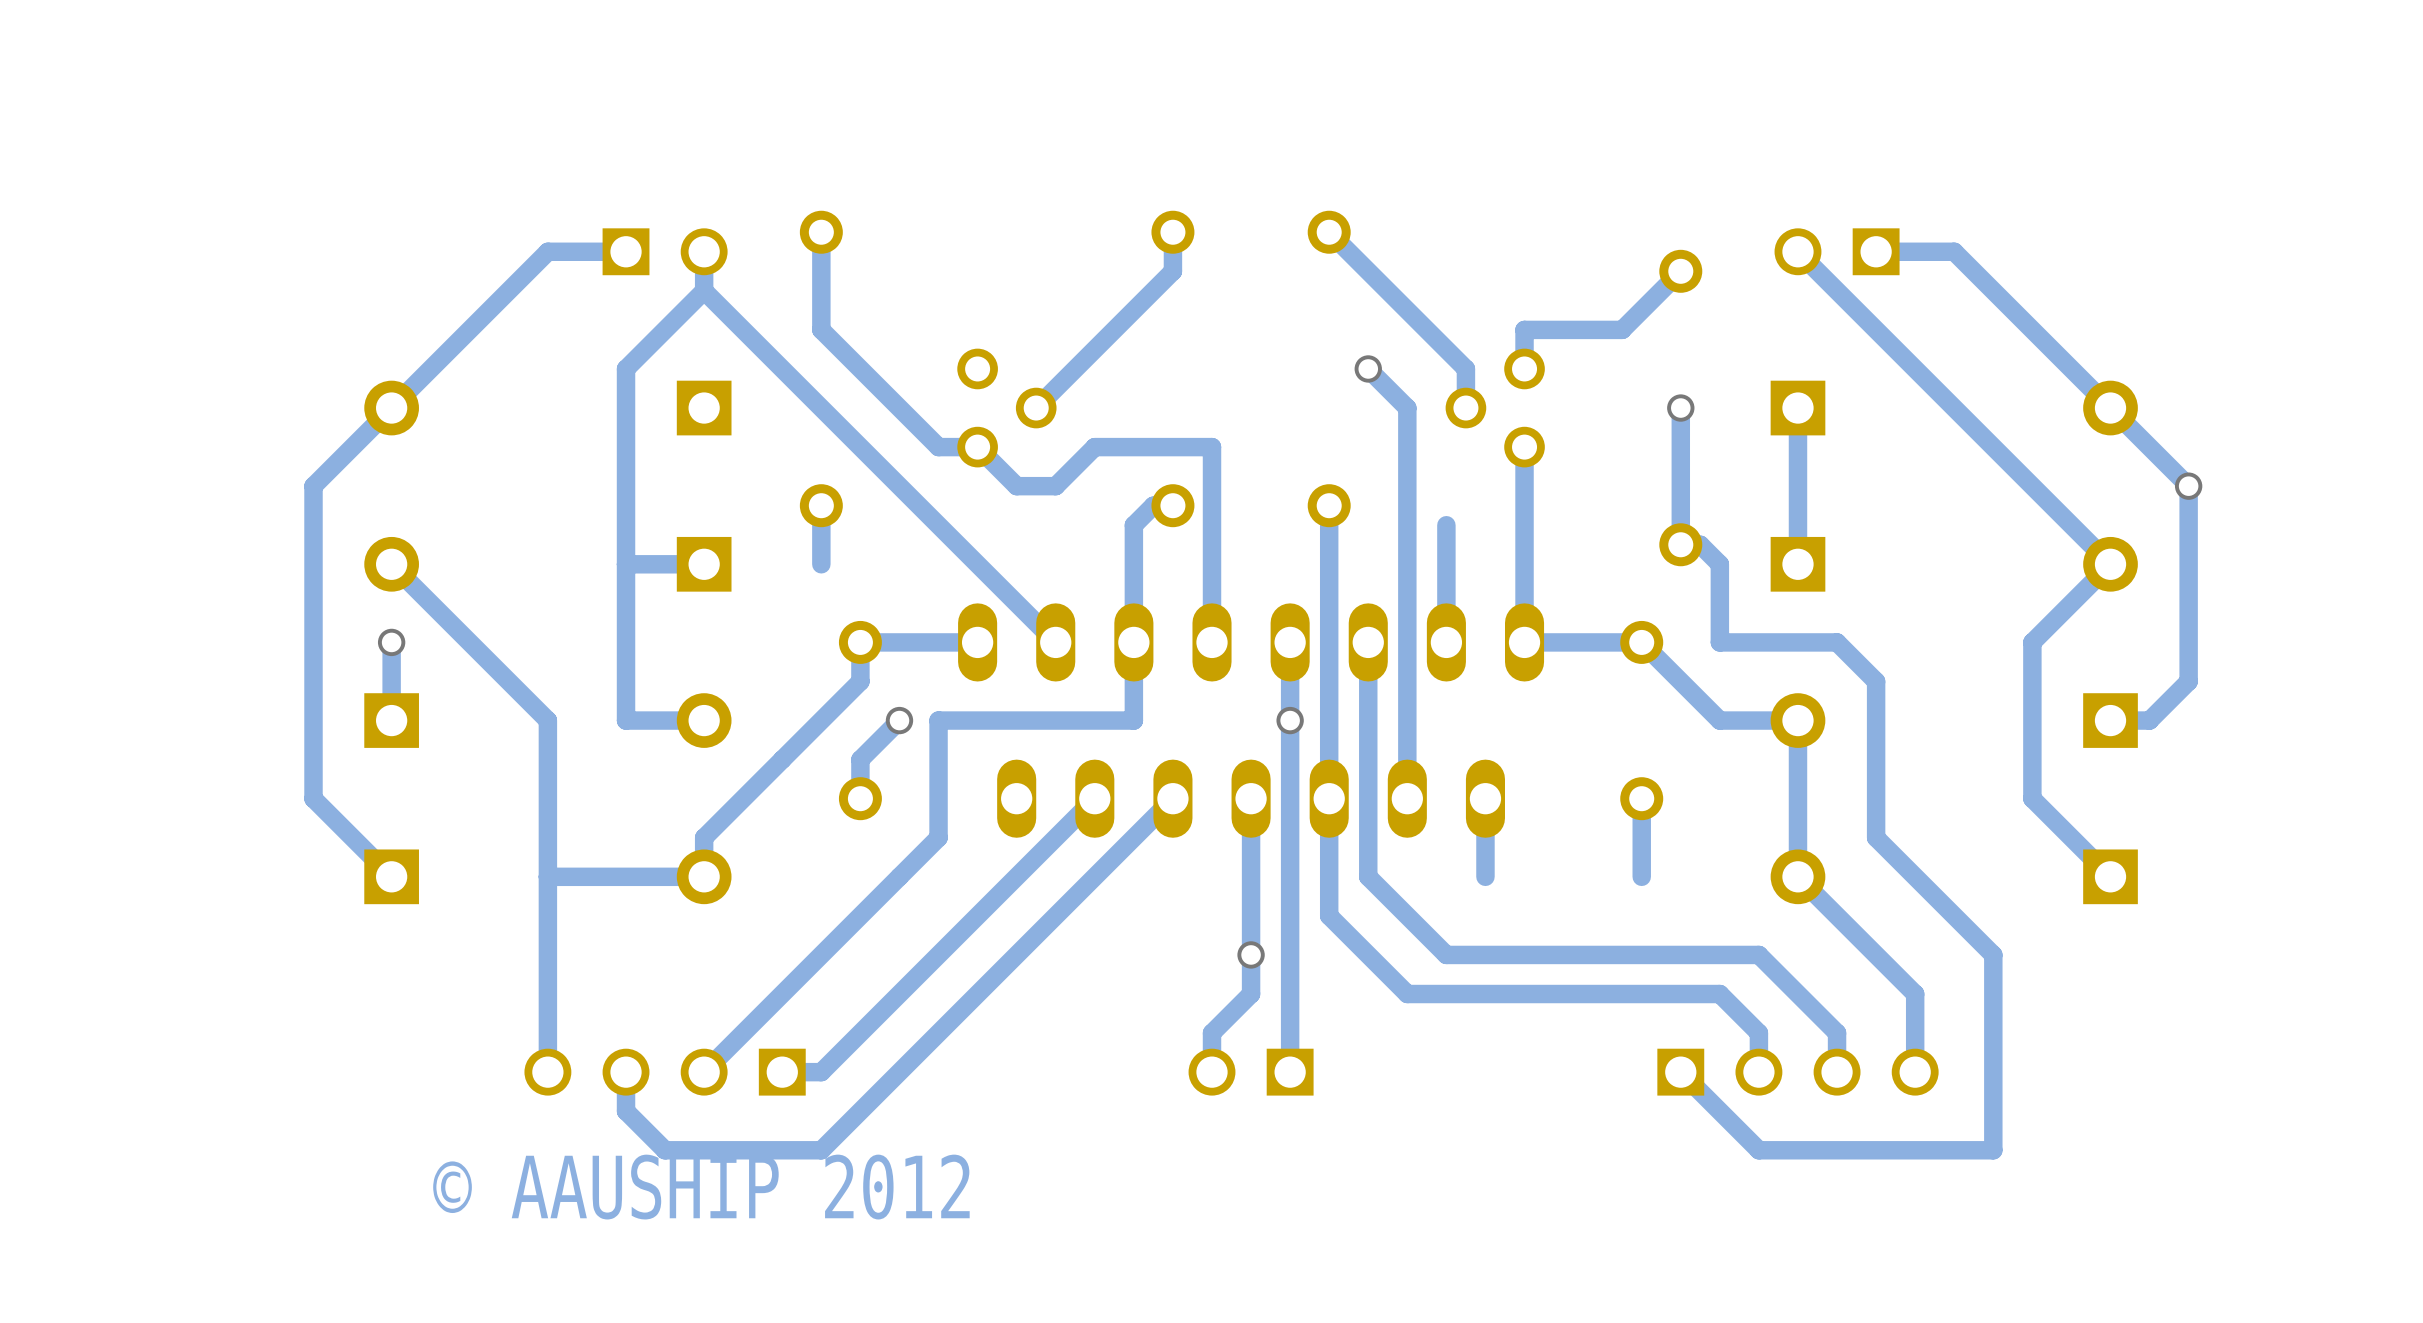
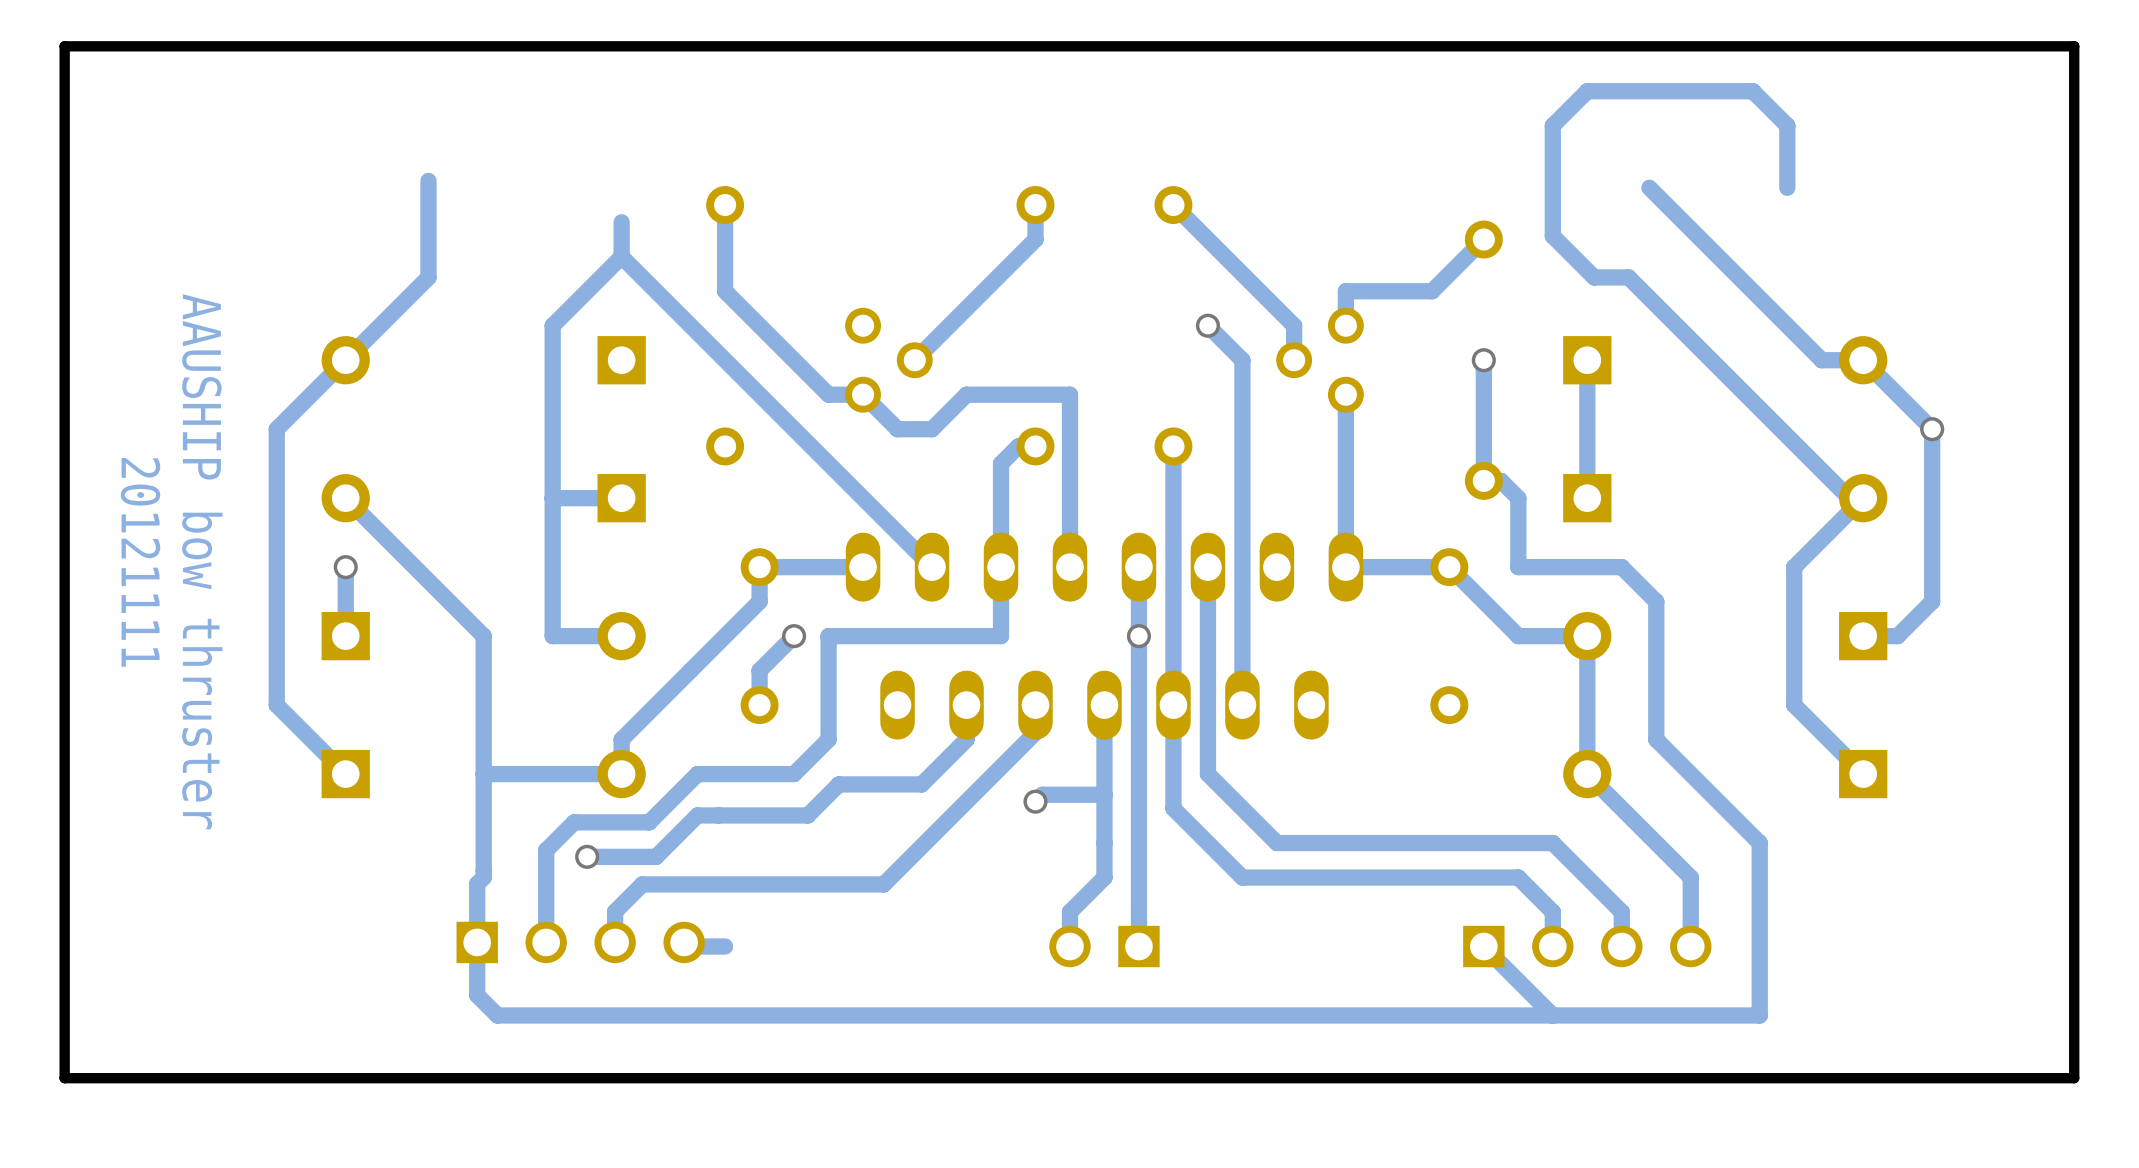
board edge: none -> (2074, 46) (2074, 1078) (64, 1078) (64, 46) (2074, 46)
track: (626, 251) (547, 251) (485, 314) -> (428, 180) (428, 277)
part: (665, 251) -> none
track: (1797, 251) (2110, 564) -> (1787, 187) (1787, 125) (1752, 91) (1587, 91) (1552, 125) (1552, 236) (1594, 277) (1628, 277) (1849, 498) (1863, 498)
part: (1837, 251) -> none
track: (1876, 251) (1954, 251) (2110, 408) -> (1649, 187) (1821, 360) (1863, 360)
track: (821, 505) (821, 564) -> none
track: (1446, 525) (1446, 642) -> none
text: none -> AAUSHIP bow thruster (202, 561)
text: none -> 20121111 (140, 562)
track: (1094, 798) (821, 1072) -> (966, 705) (966, 739) (921, 784) (838, 784) (807, 815) (697, 815) (656, 856) (587, 856)
track: (1172, 798) (821, 1150) -> (1035, 705) (1035, 732) (883, 884) (642, 884) (615, 911) (615, 942)
track: (1485, 798) (1485, 876) -> none
track: (1641, 798) (1641, 876) -> none
track: (899, 876) (704, 1072) -> (794, 774) (697, 774) (649, 822) (574, 822) (546, 850) (546, 942)
track: none -> (1104, 794) (1042, 794) (1035, 801)
via position: (1251, 954) -> (1035, 801)
via: none -> (587, 856)
track: (547, 994) (547, 1072) -> none
track: (626, 1072) (626, 1111) (665, 1150) -> (483, 877) (477, 884) (477, 995) (497, 1015) (587, 1015)
part rotation: 0° (665, 1072) -> 180° (580, 942)
track: none -> (1552, 1015) (725, 1015)
text: © AAUSHIP 2012 (701, 1187) -> none

